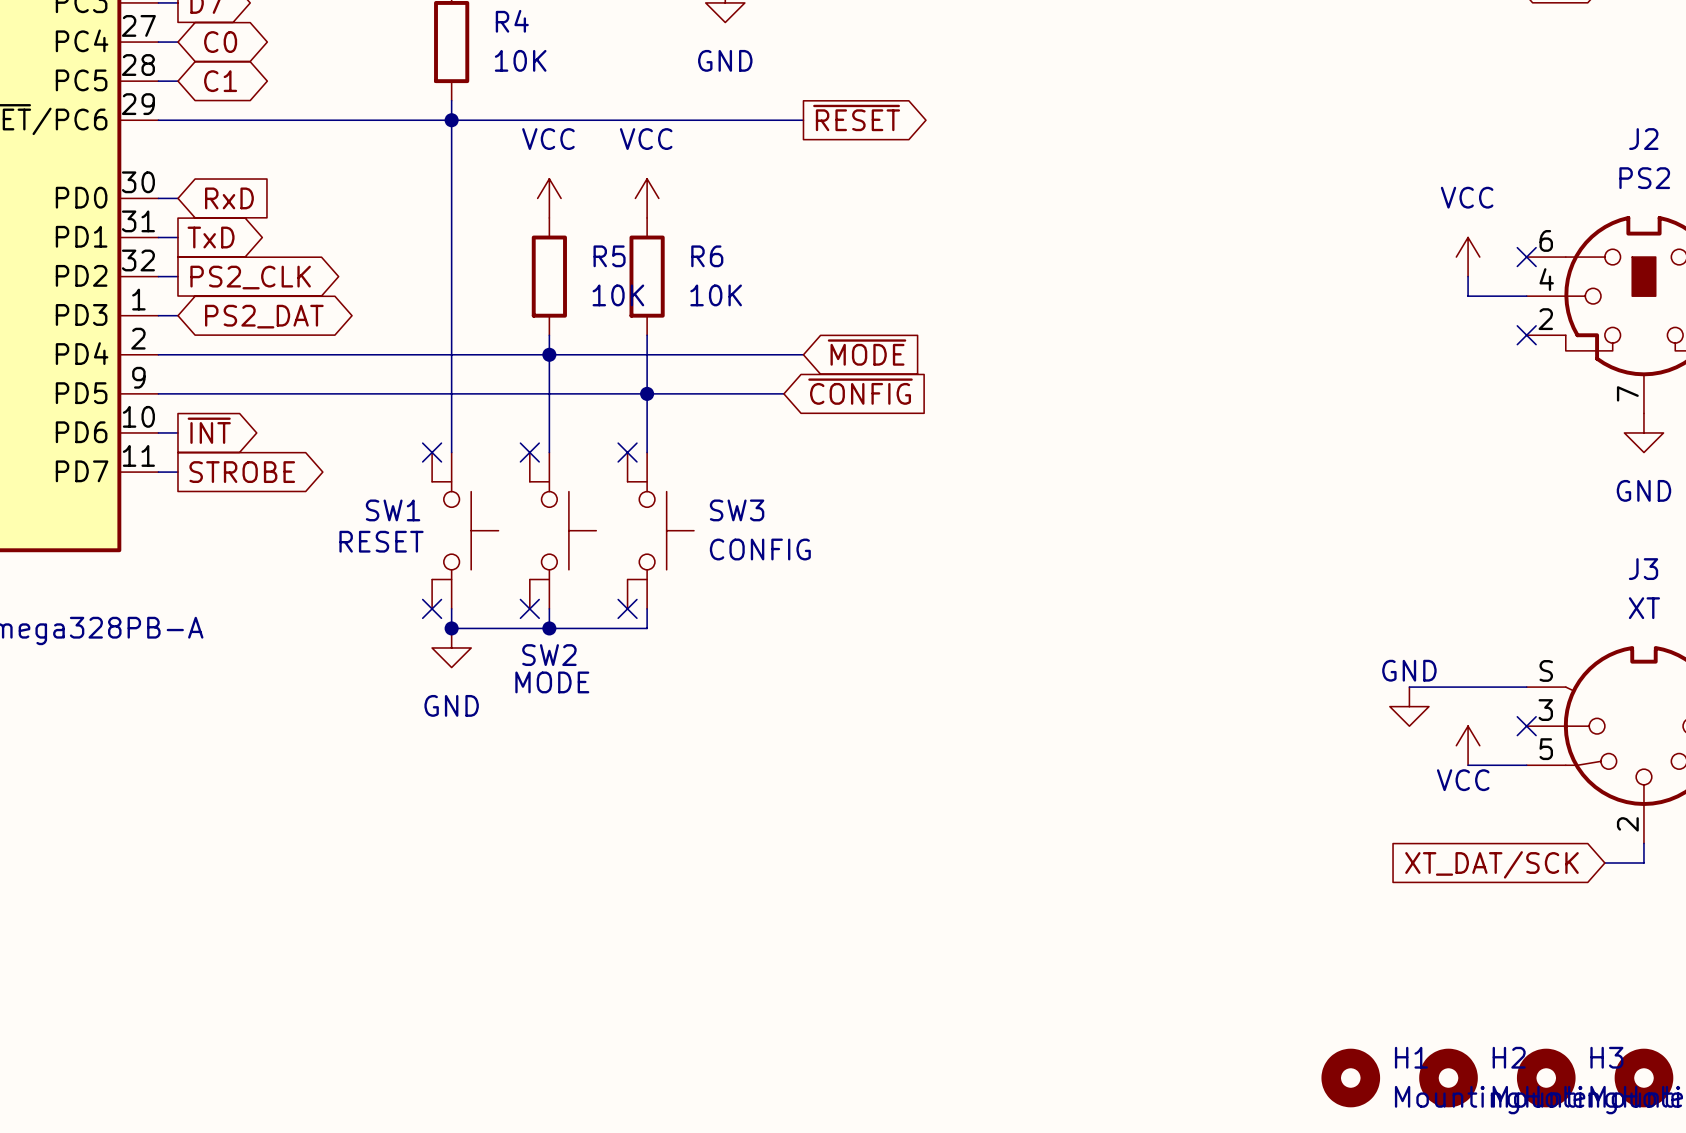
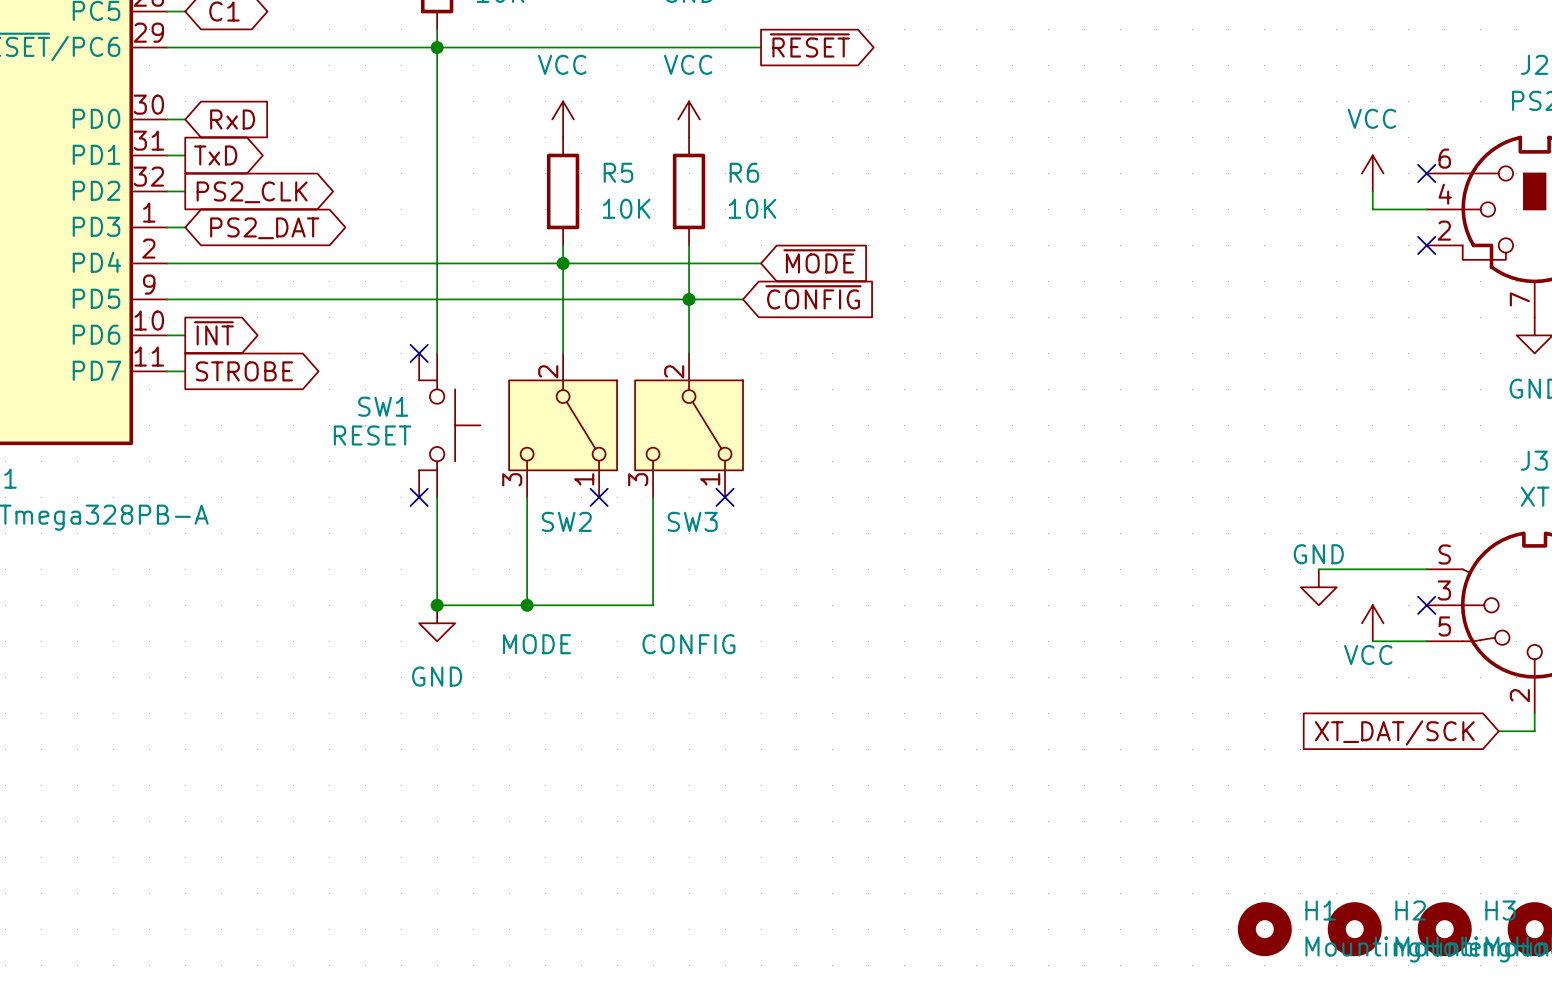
power symbol: VCC (549, 198) -> none
power symbol: none -> VCC (563, 119)
power symbol: VCC (647, 198) -> none
power symbol: none -> VCC (689, 119)
R5 position: (549, 276) -> (563, 191)
R6 position: (647, 276) -> (689, 191)
wire: (549, 335) (549, 452) -> (563, 245) (563, 353)
wire: (647, 335) (647, 452) -> (689, 245) (689, 353)
junction: (549, 354) -> none
junction: none -> (563, 263)
junction: (647, 393) -> none
junction: none -> (689, 299)
no-connect mark: (529, 452) -> none
SW2 symbol: [529, 452, 597, 609] -> [509, 353, 618, 498]
no-connect mark: (627, 452) -> none
SW3 symbol: [627, 452, 695, 609] -> [635, 353, 744, 498]
SW3 name position: SW3 (737, 510) -> SW3 (692, 521)
SW3 value position: CONFIG (760, 549) -> CONFIG (688, 644)
no-connect mark: (529, 608) -> none
wire: (647, 608) (647, 628) (451, 628) -> (653, 497) (653, 605) (437, 605) (437, 515)
no-connect mark: none -> (725, 497)
junction: (451, 628) -> none
wire: none -> (527, 515) (527, 605)
junction: (549, 628) -> none
power symbol position: GND (451, 647) -> GND (437, 623)
SW2 value position: MODE (552, 682) -> MODE (537, 644)
junction: none -> (437, 605)
junction: none -> (527, 605)

